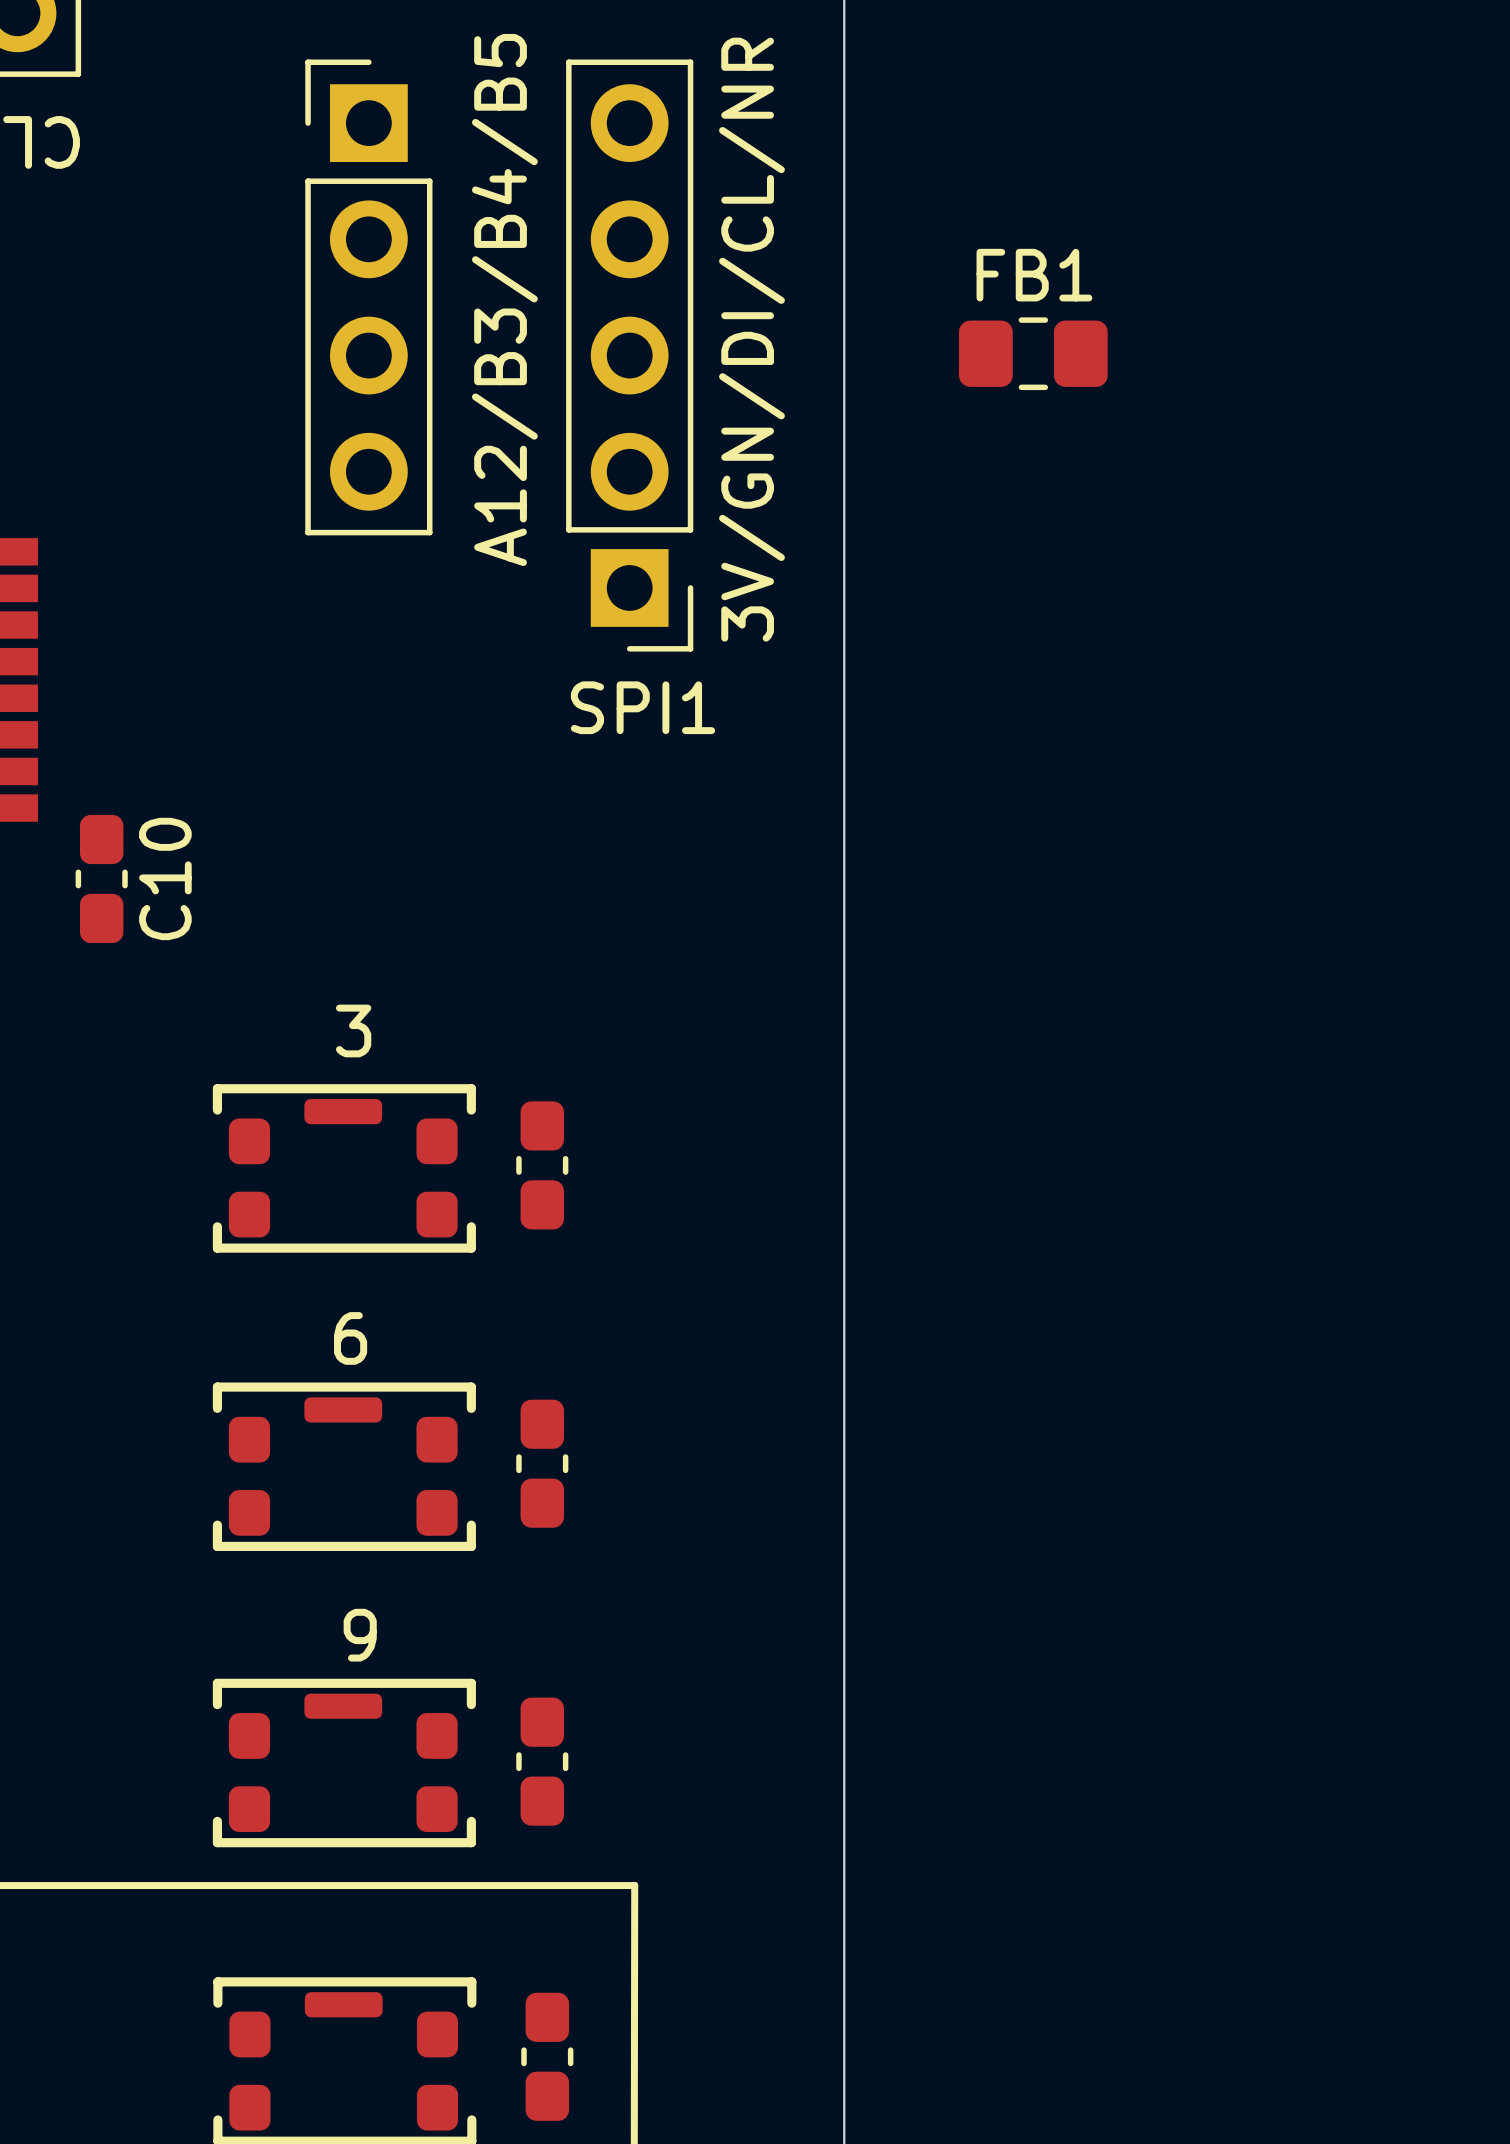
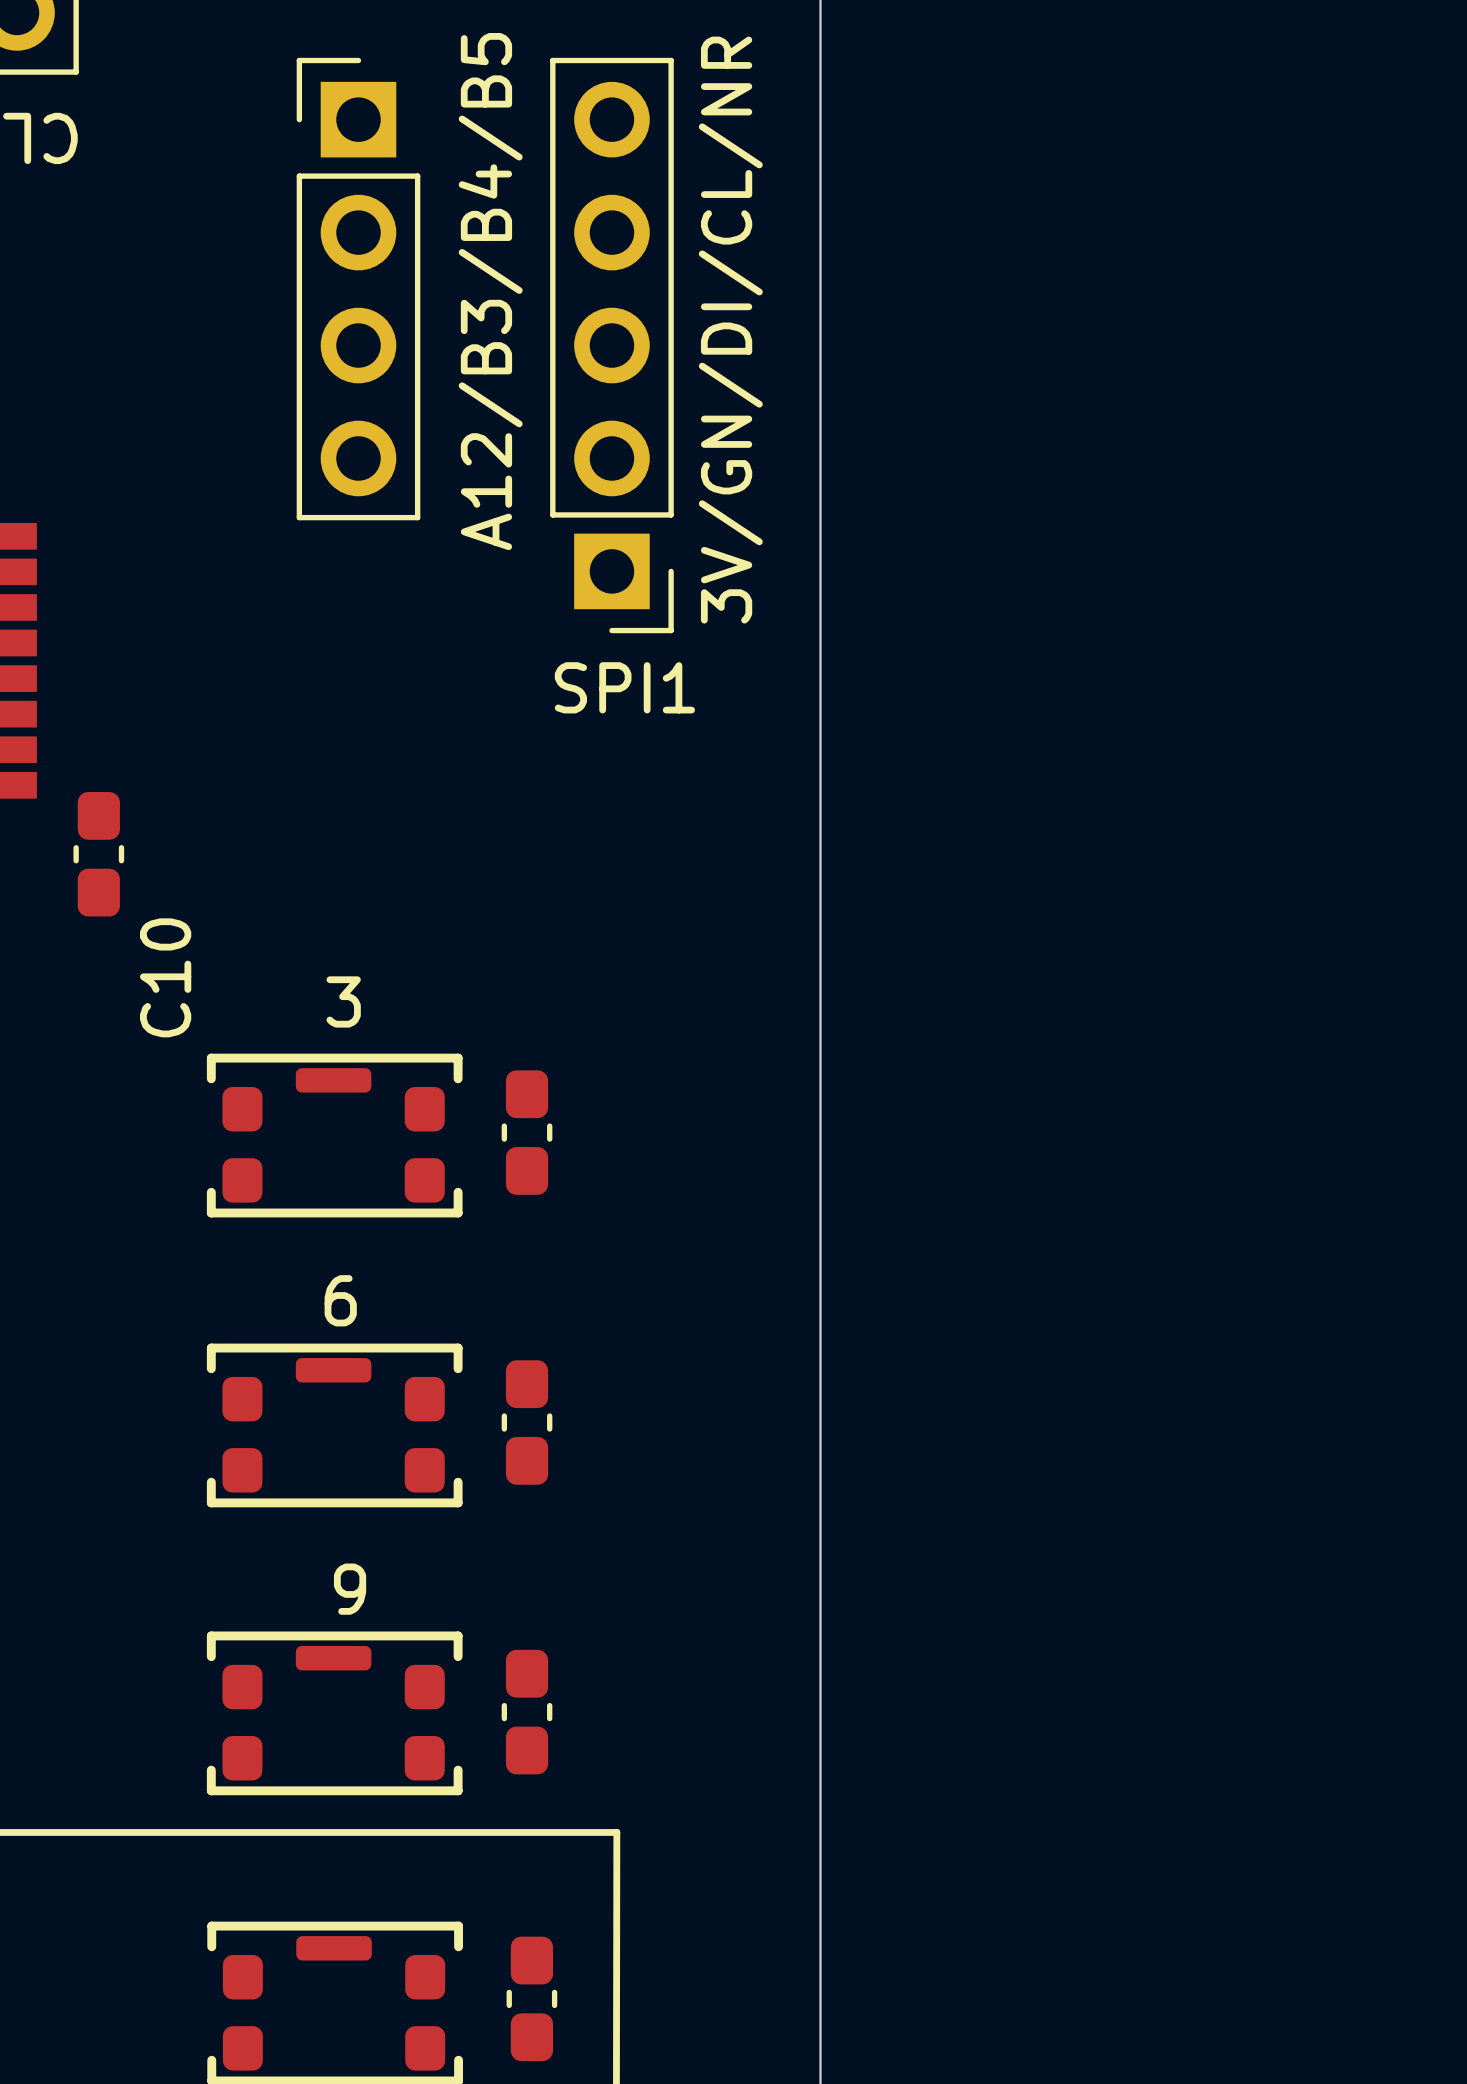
FB1: (1033, 353) -> none
C10 name position: C10 (165, 878) -> C10 (165, 977)

